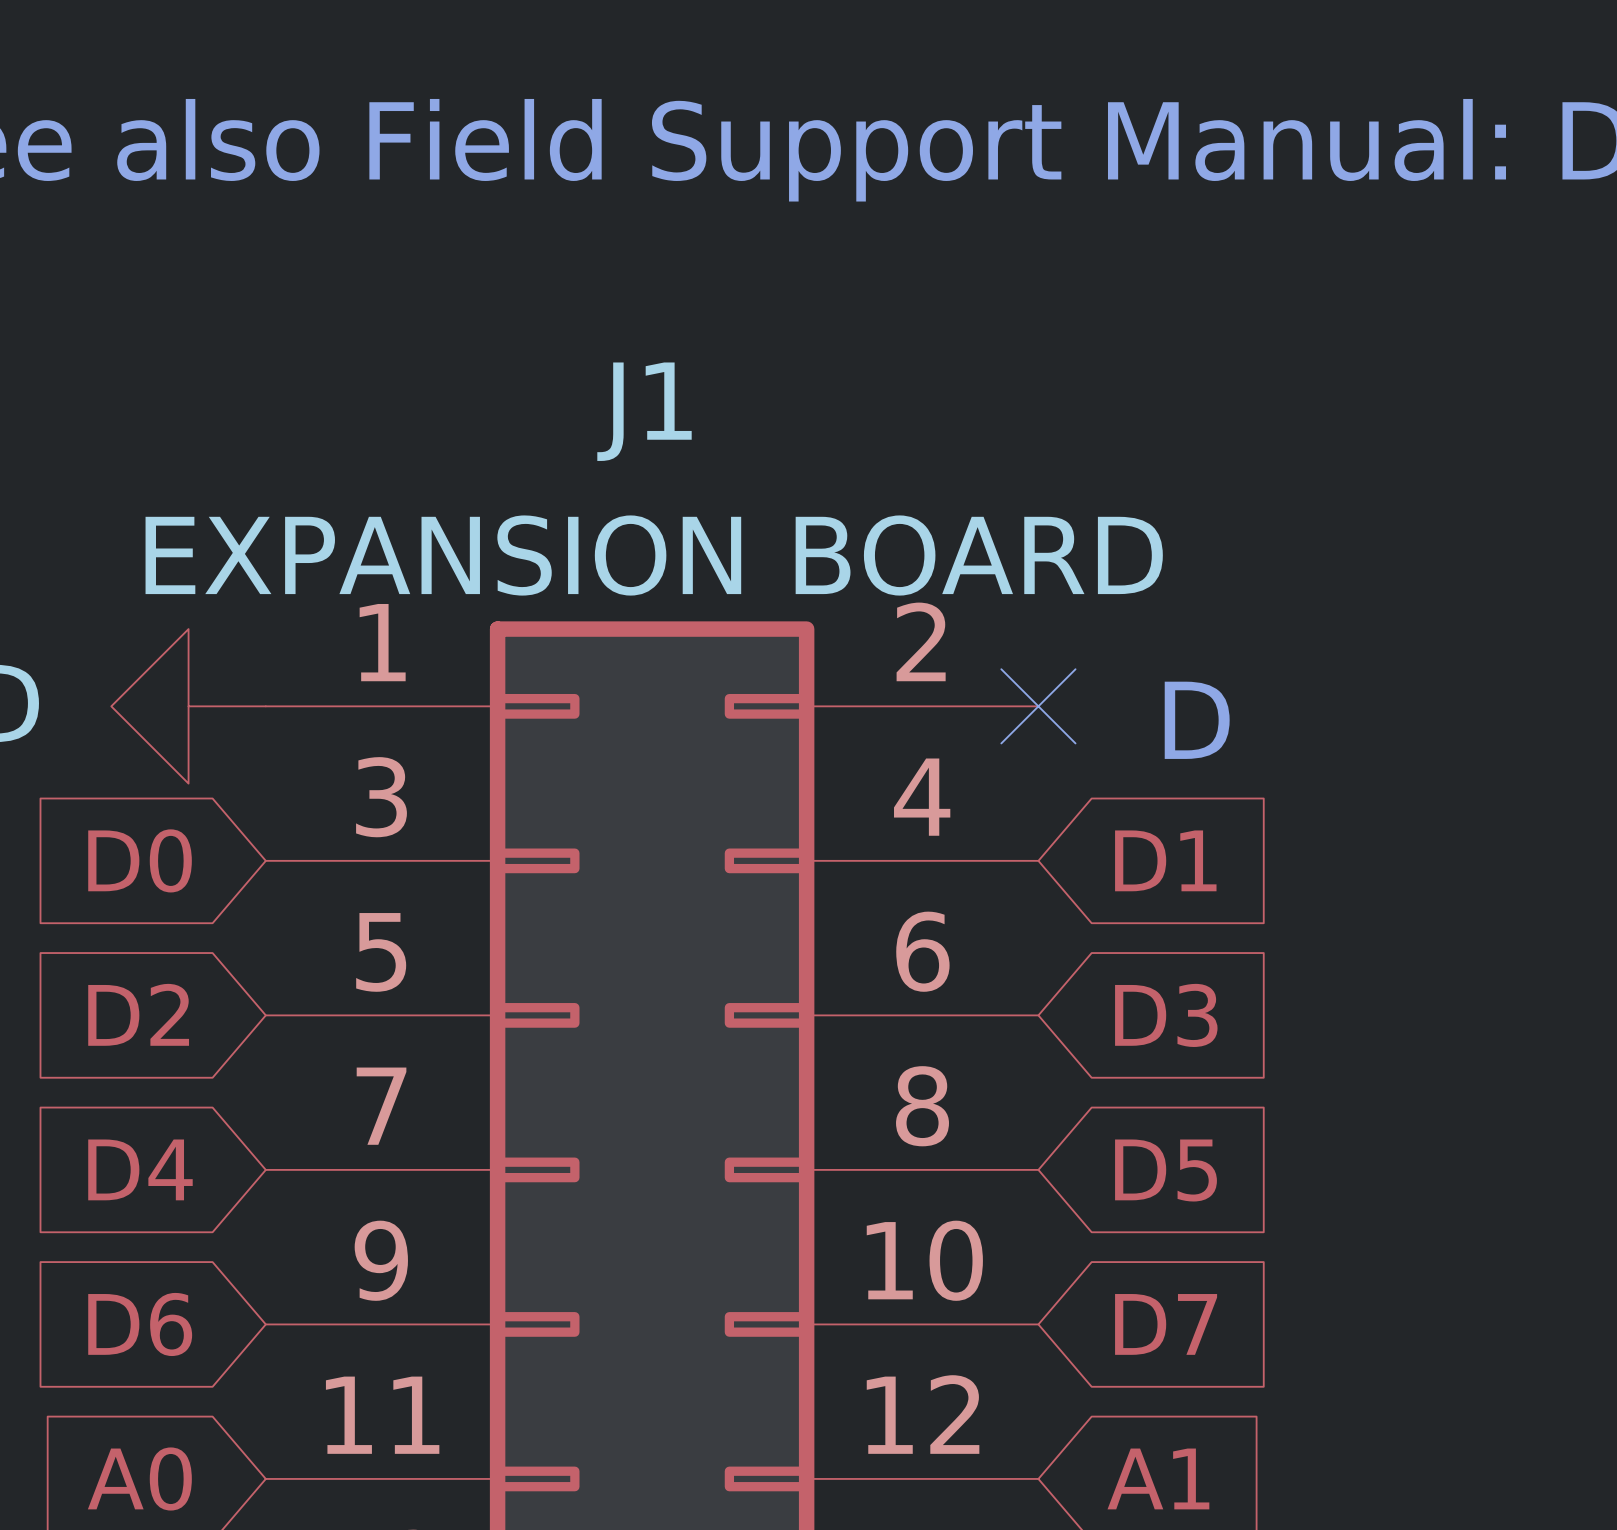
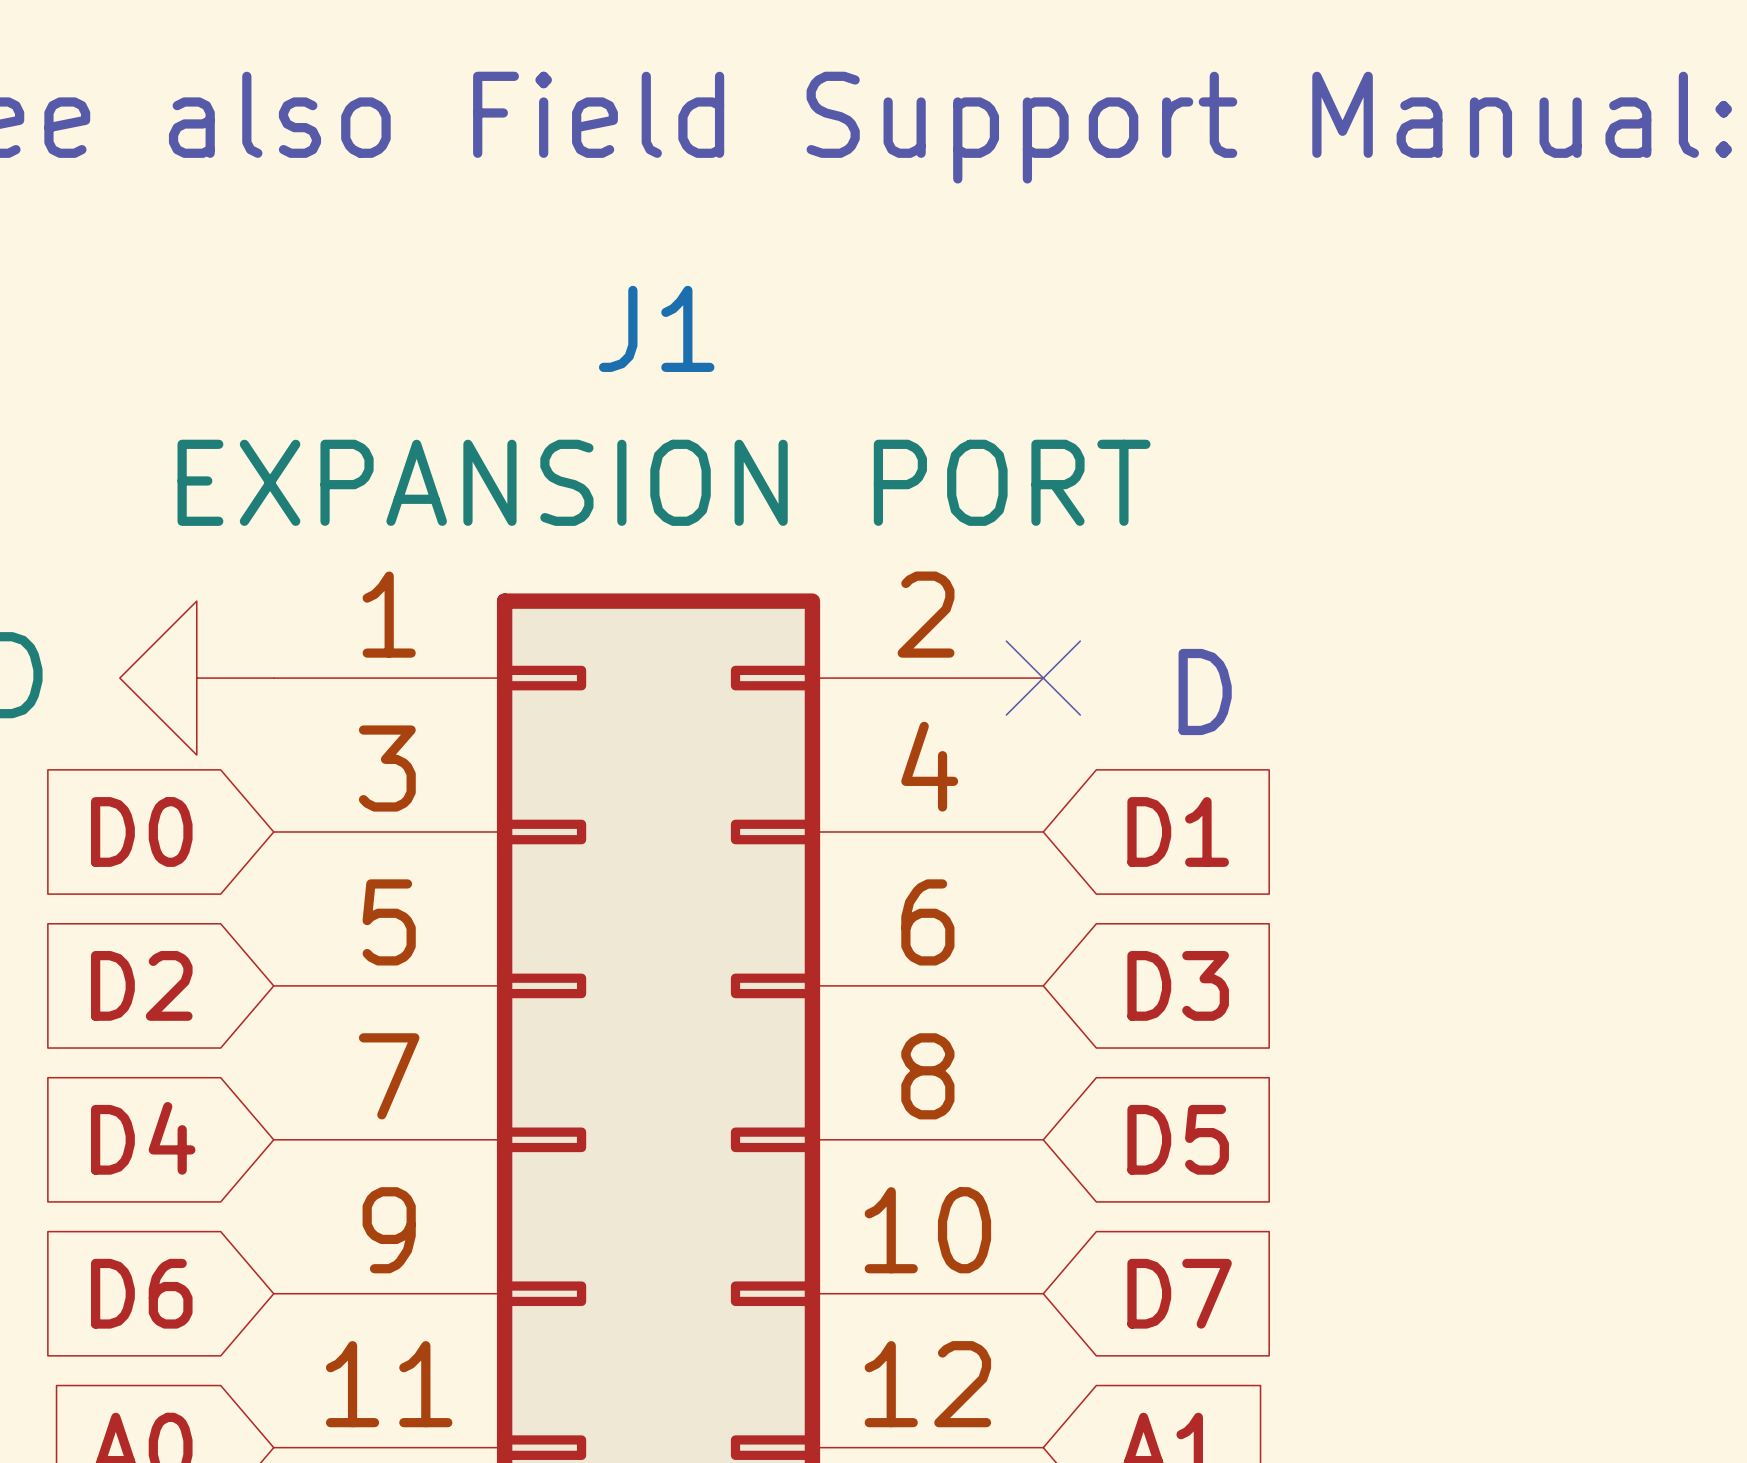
J1 name position: J1 (644, 411) -> J1 (656, 328)
J1 value: EXPANSION BOARD (654, 555) -> EXPANSION PORT (664, 482)

